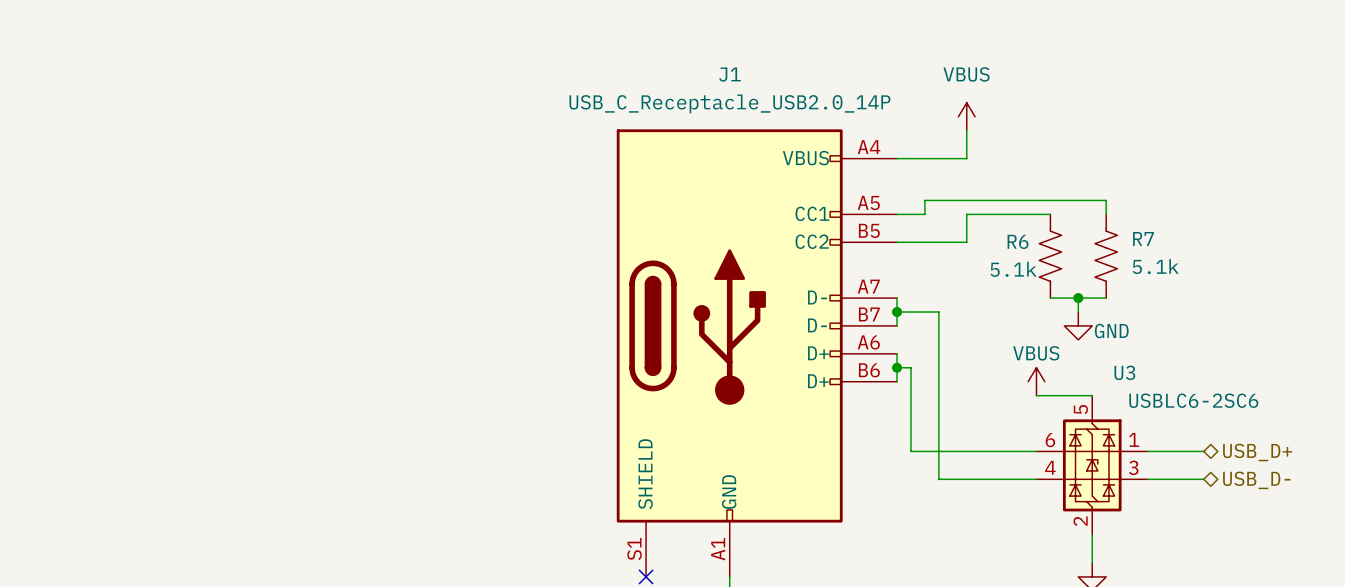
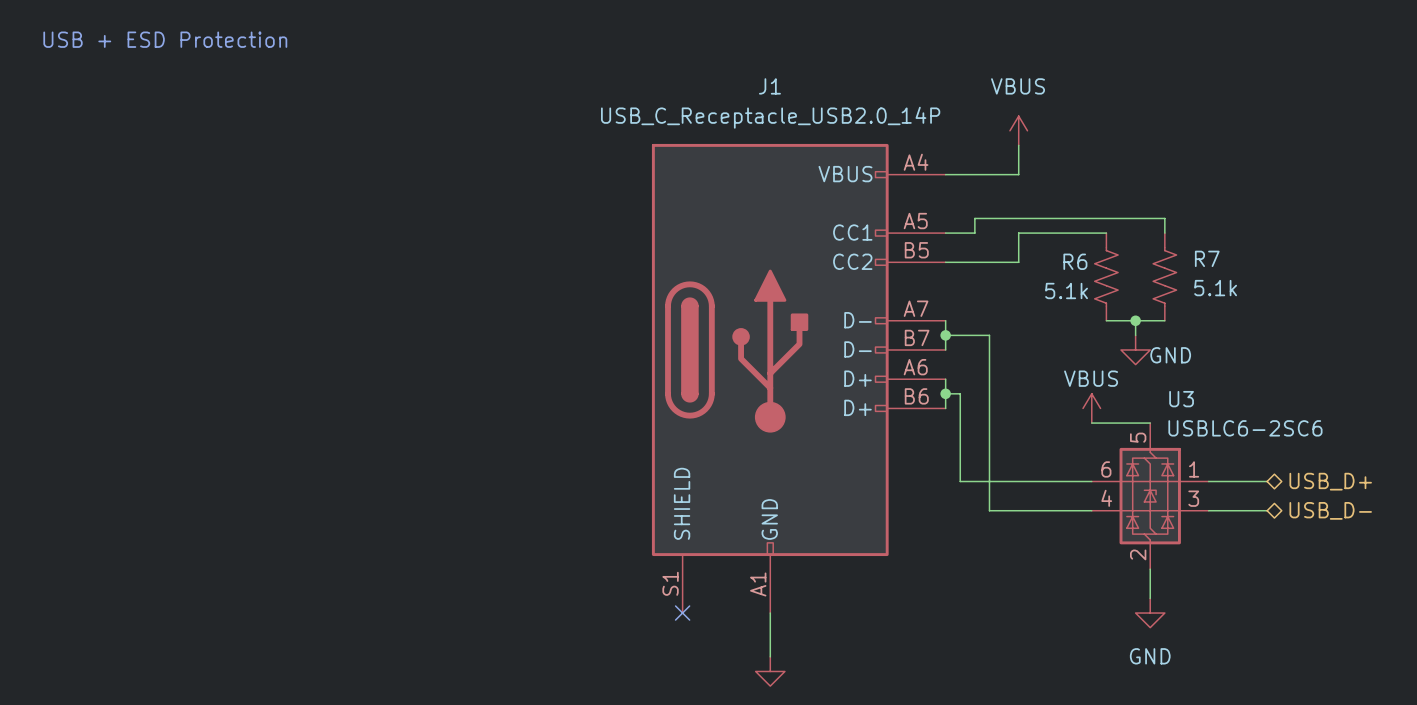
text: none -> USB + ESD Protection (165, 39)

